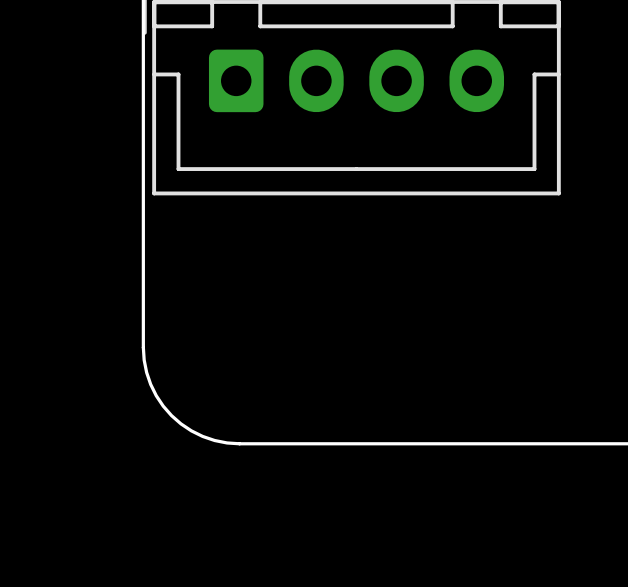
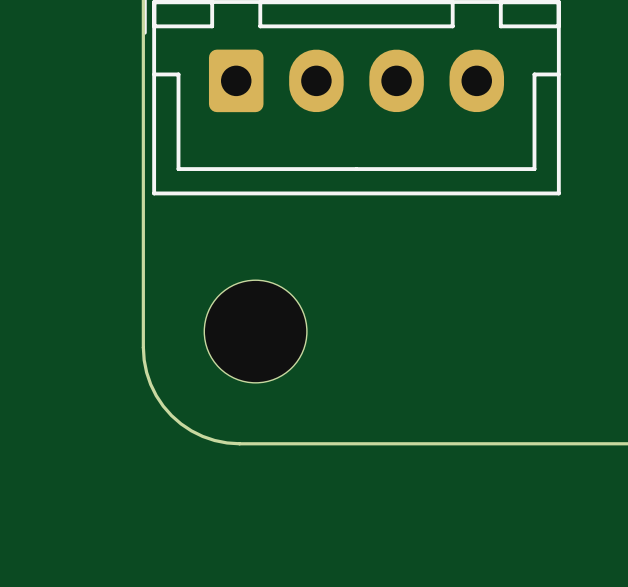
part: none -> (255, 331)

